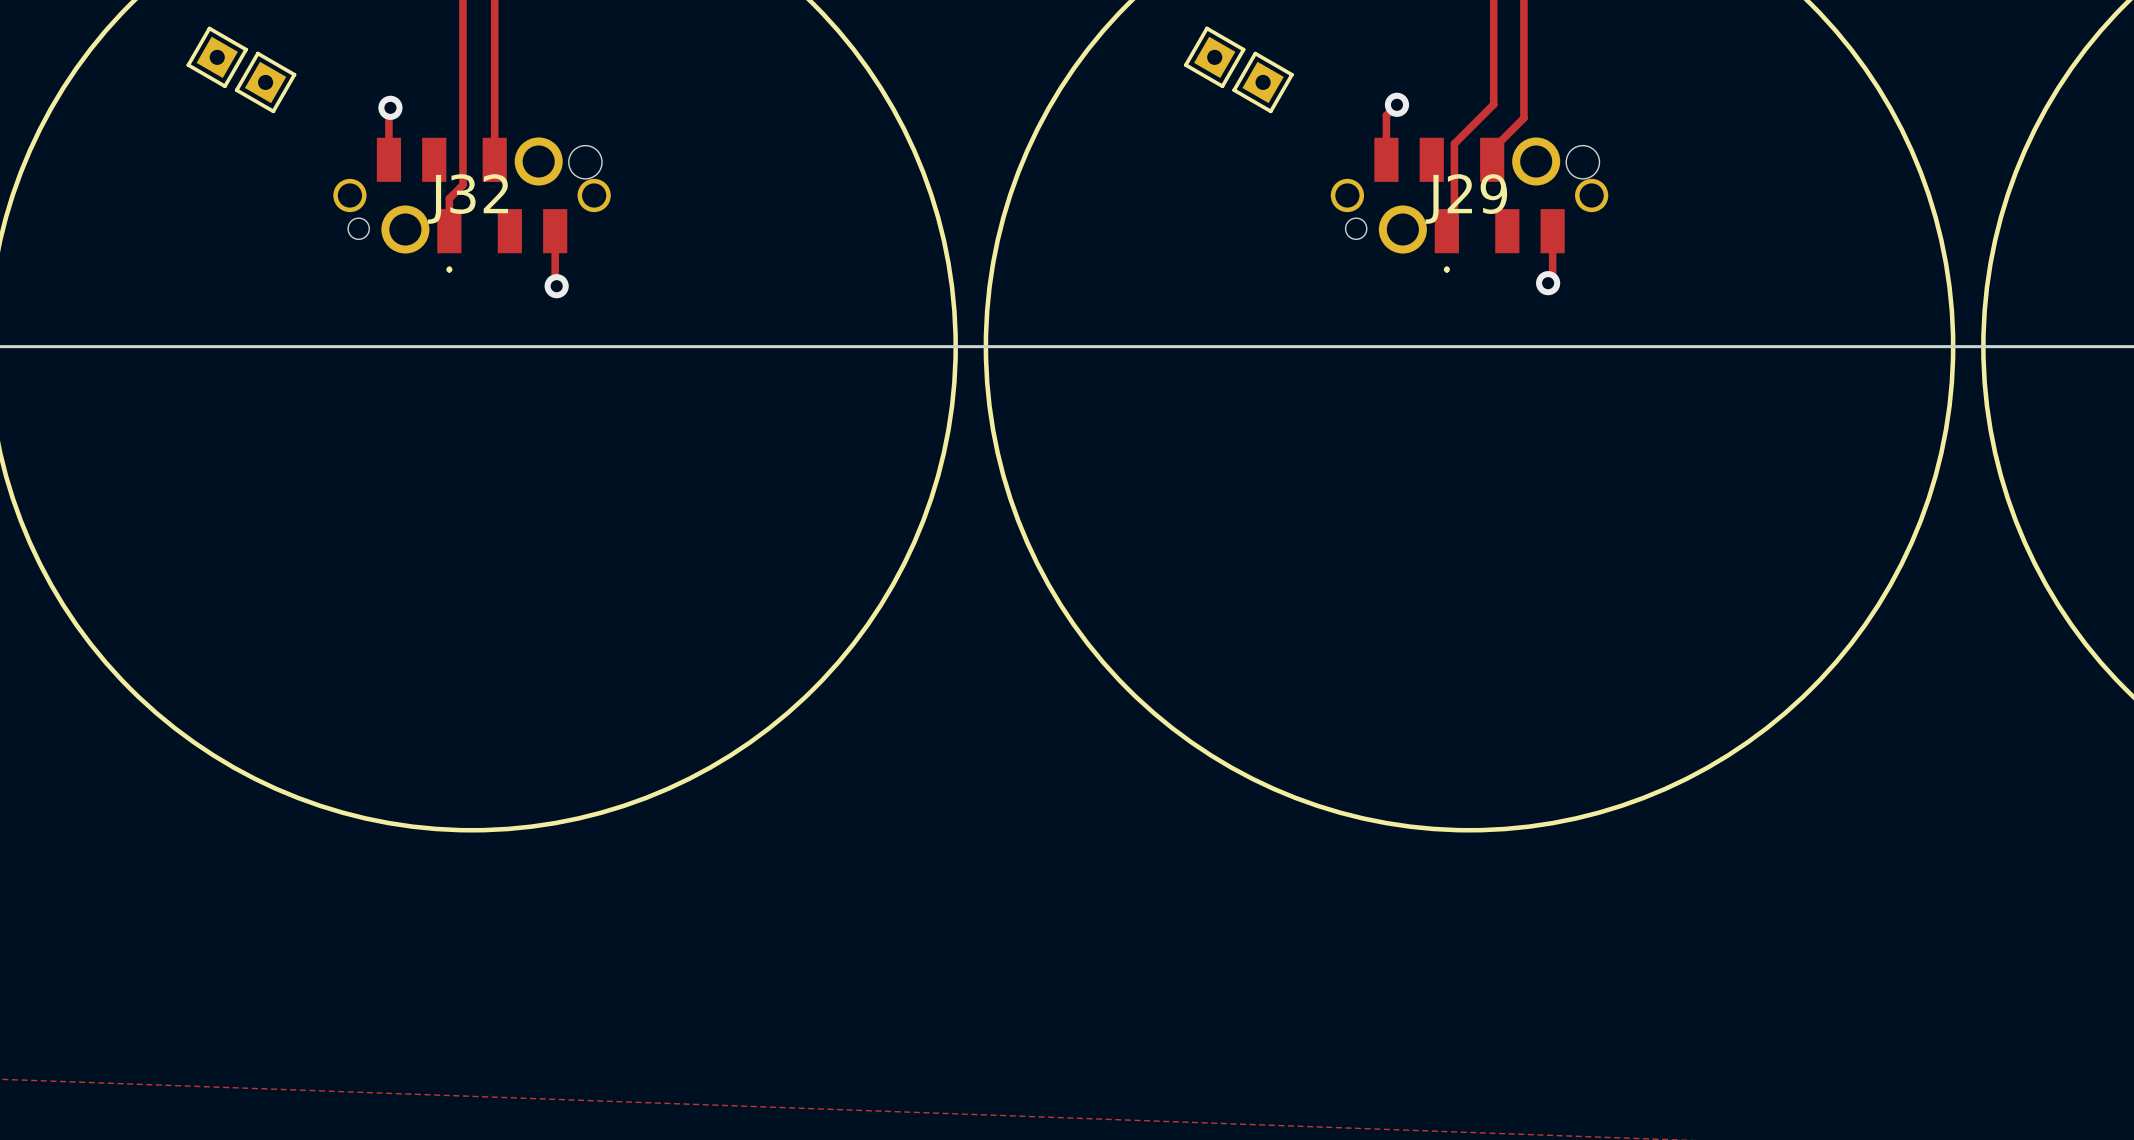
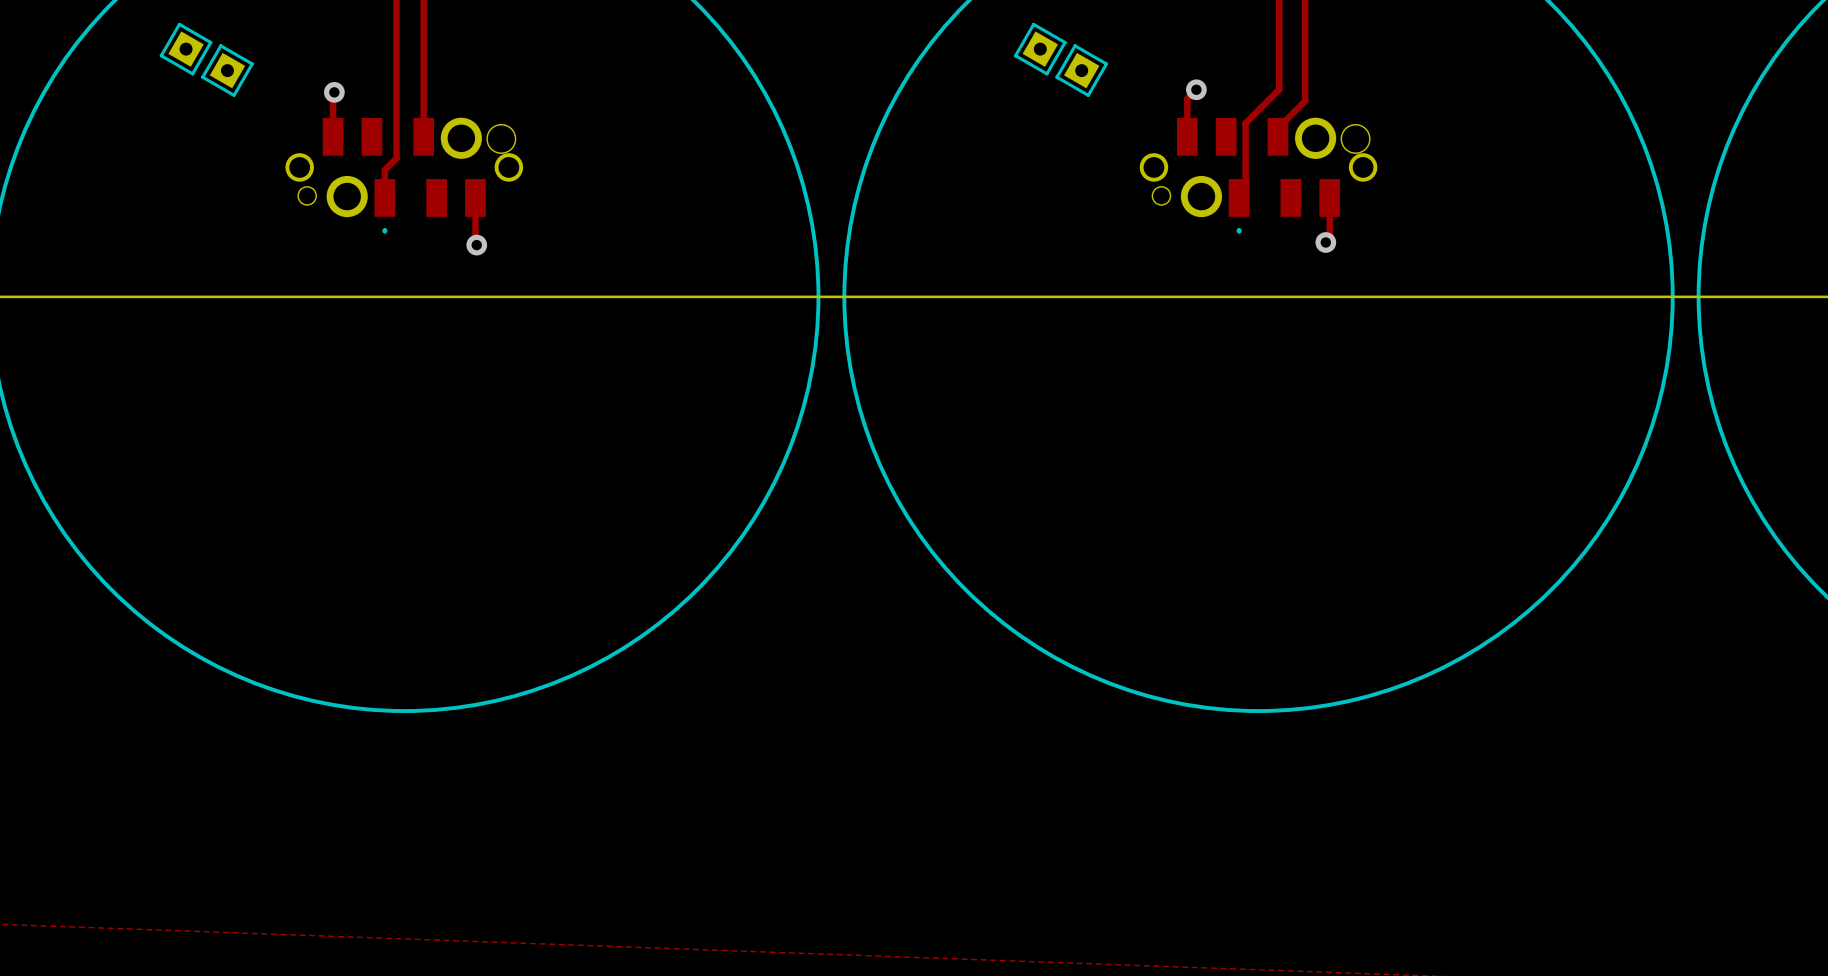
J32 name: J32 (468, 198) -> none
J29 name: J29 (1466, 198) -> none

